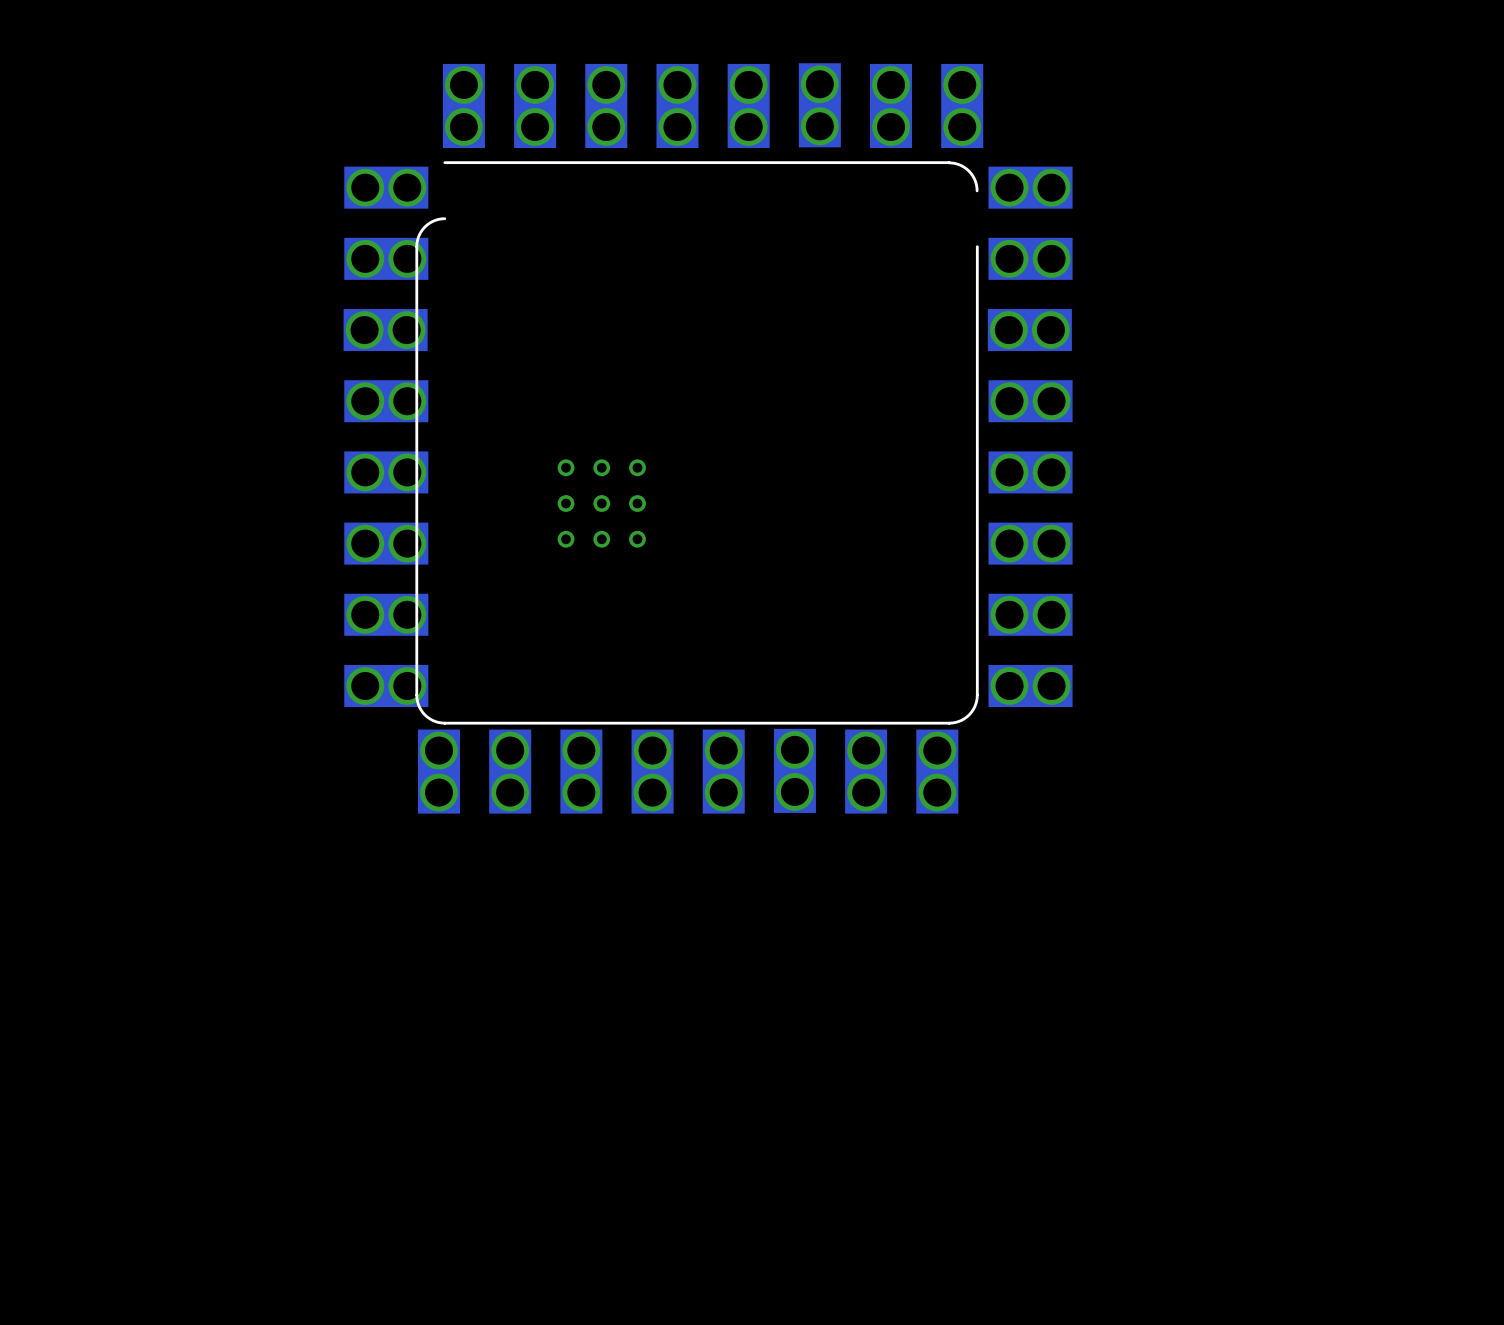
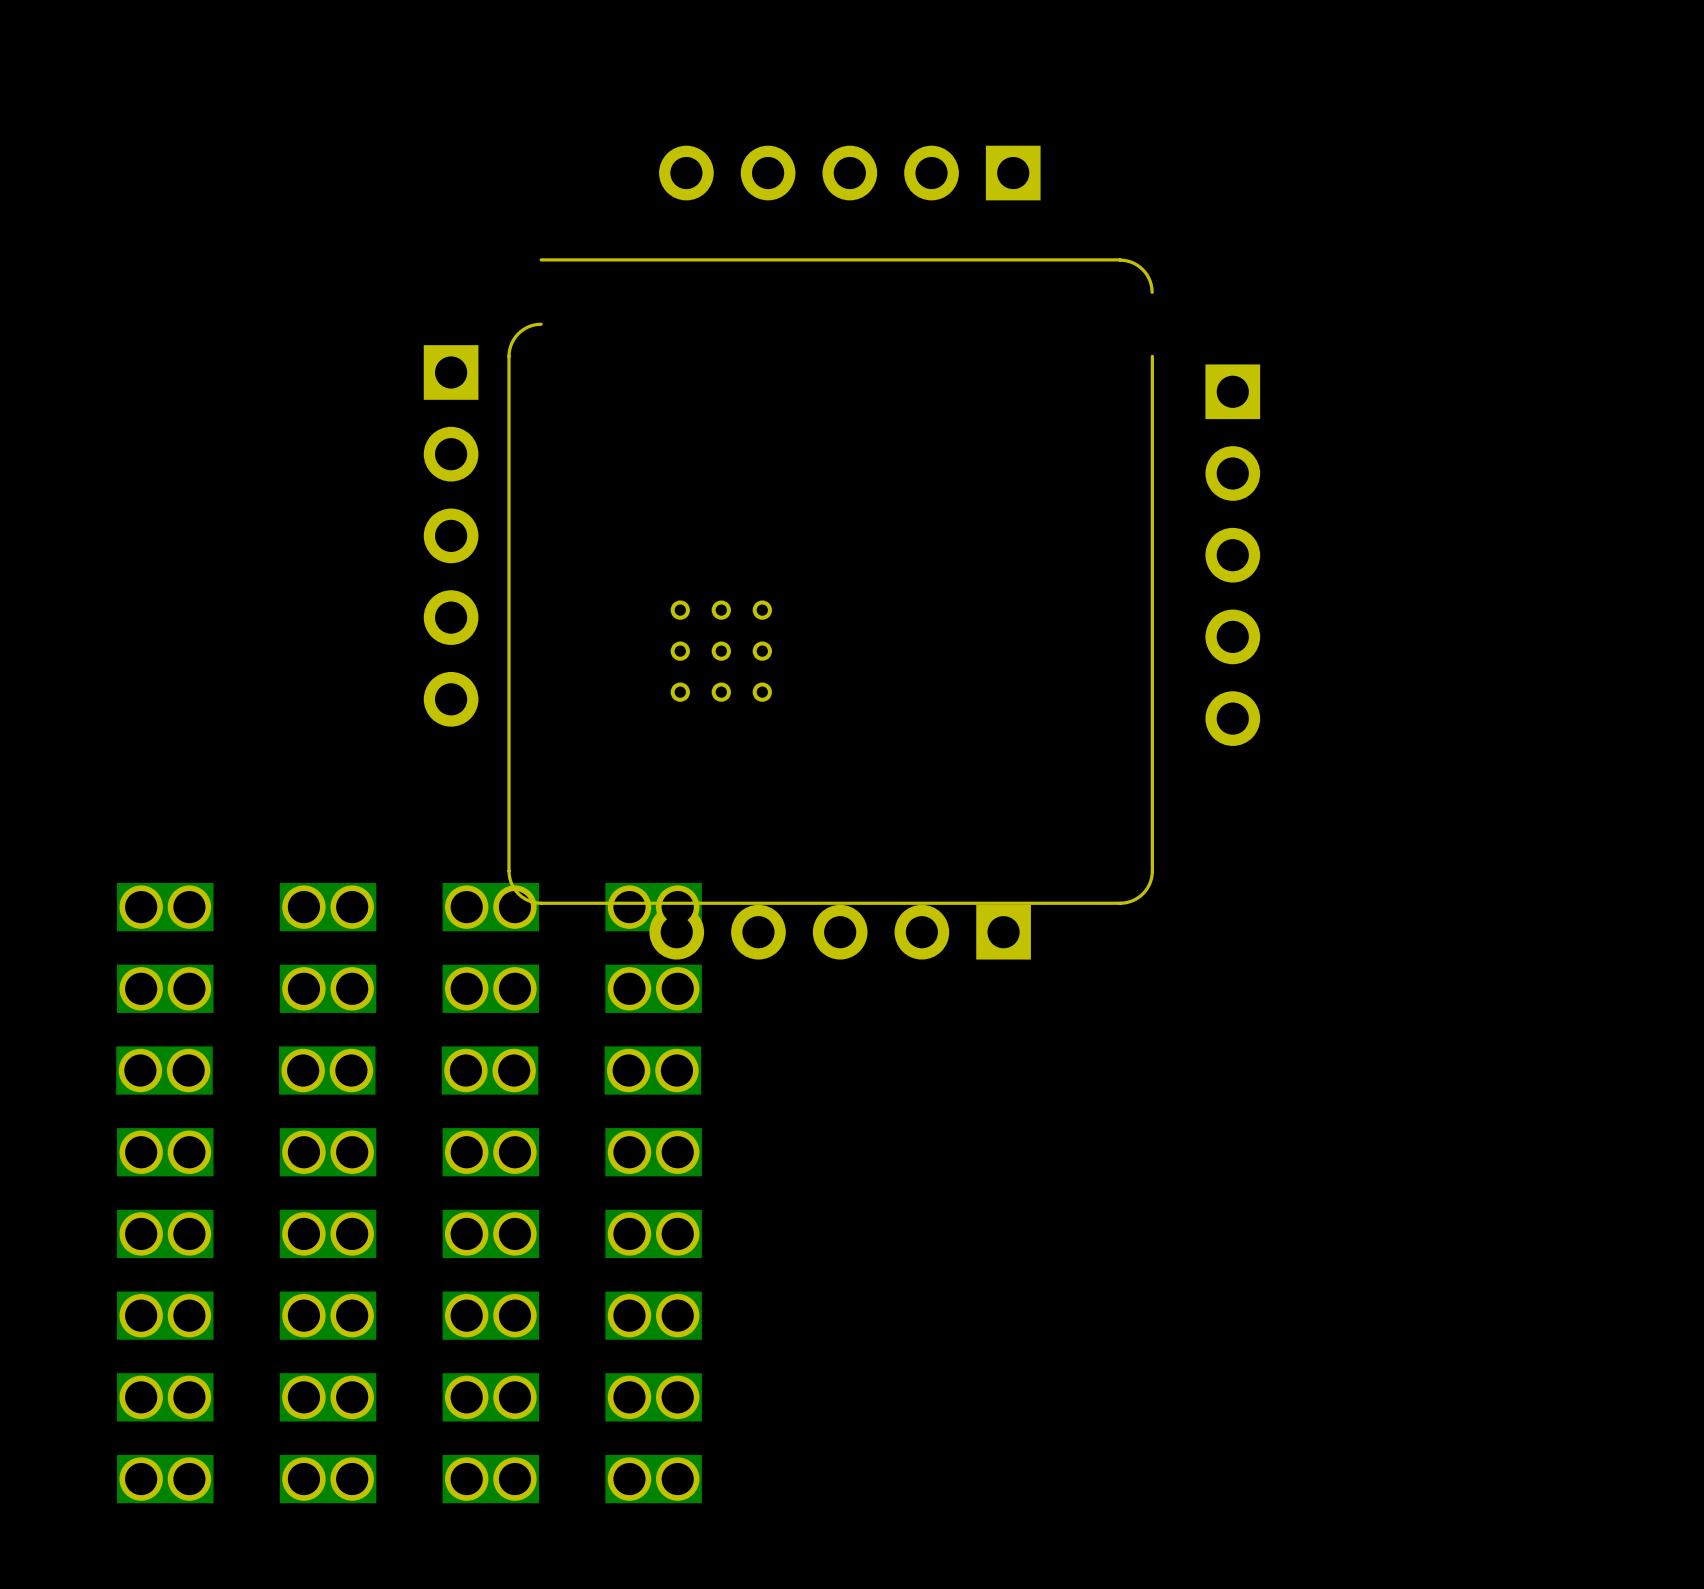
part footprint: [442, 63, 984, 149] -> [659, 145, 1041, 201]
part footprint: [987, 166, 1073, 708] -> [1205, 364, 1261, 746]
part: none -> (451, 535)
part: (385, 436) -> none
part: none -> (840, 932)
part: (688, 771) -> none
part: none -> (164, 1193)
part: none -> (327, 1193)
part: none -> (490, 1193)
part: none -> (653, 1193)

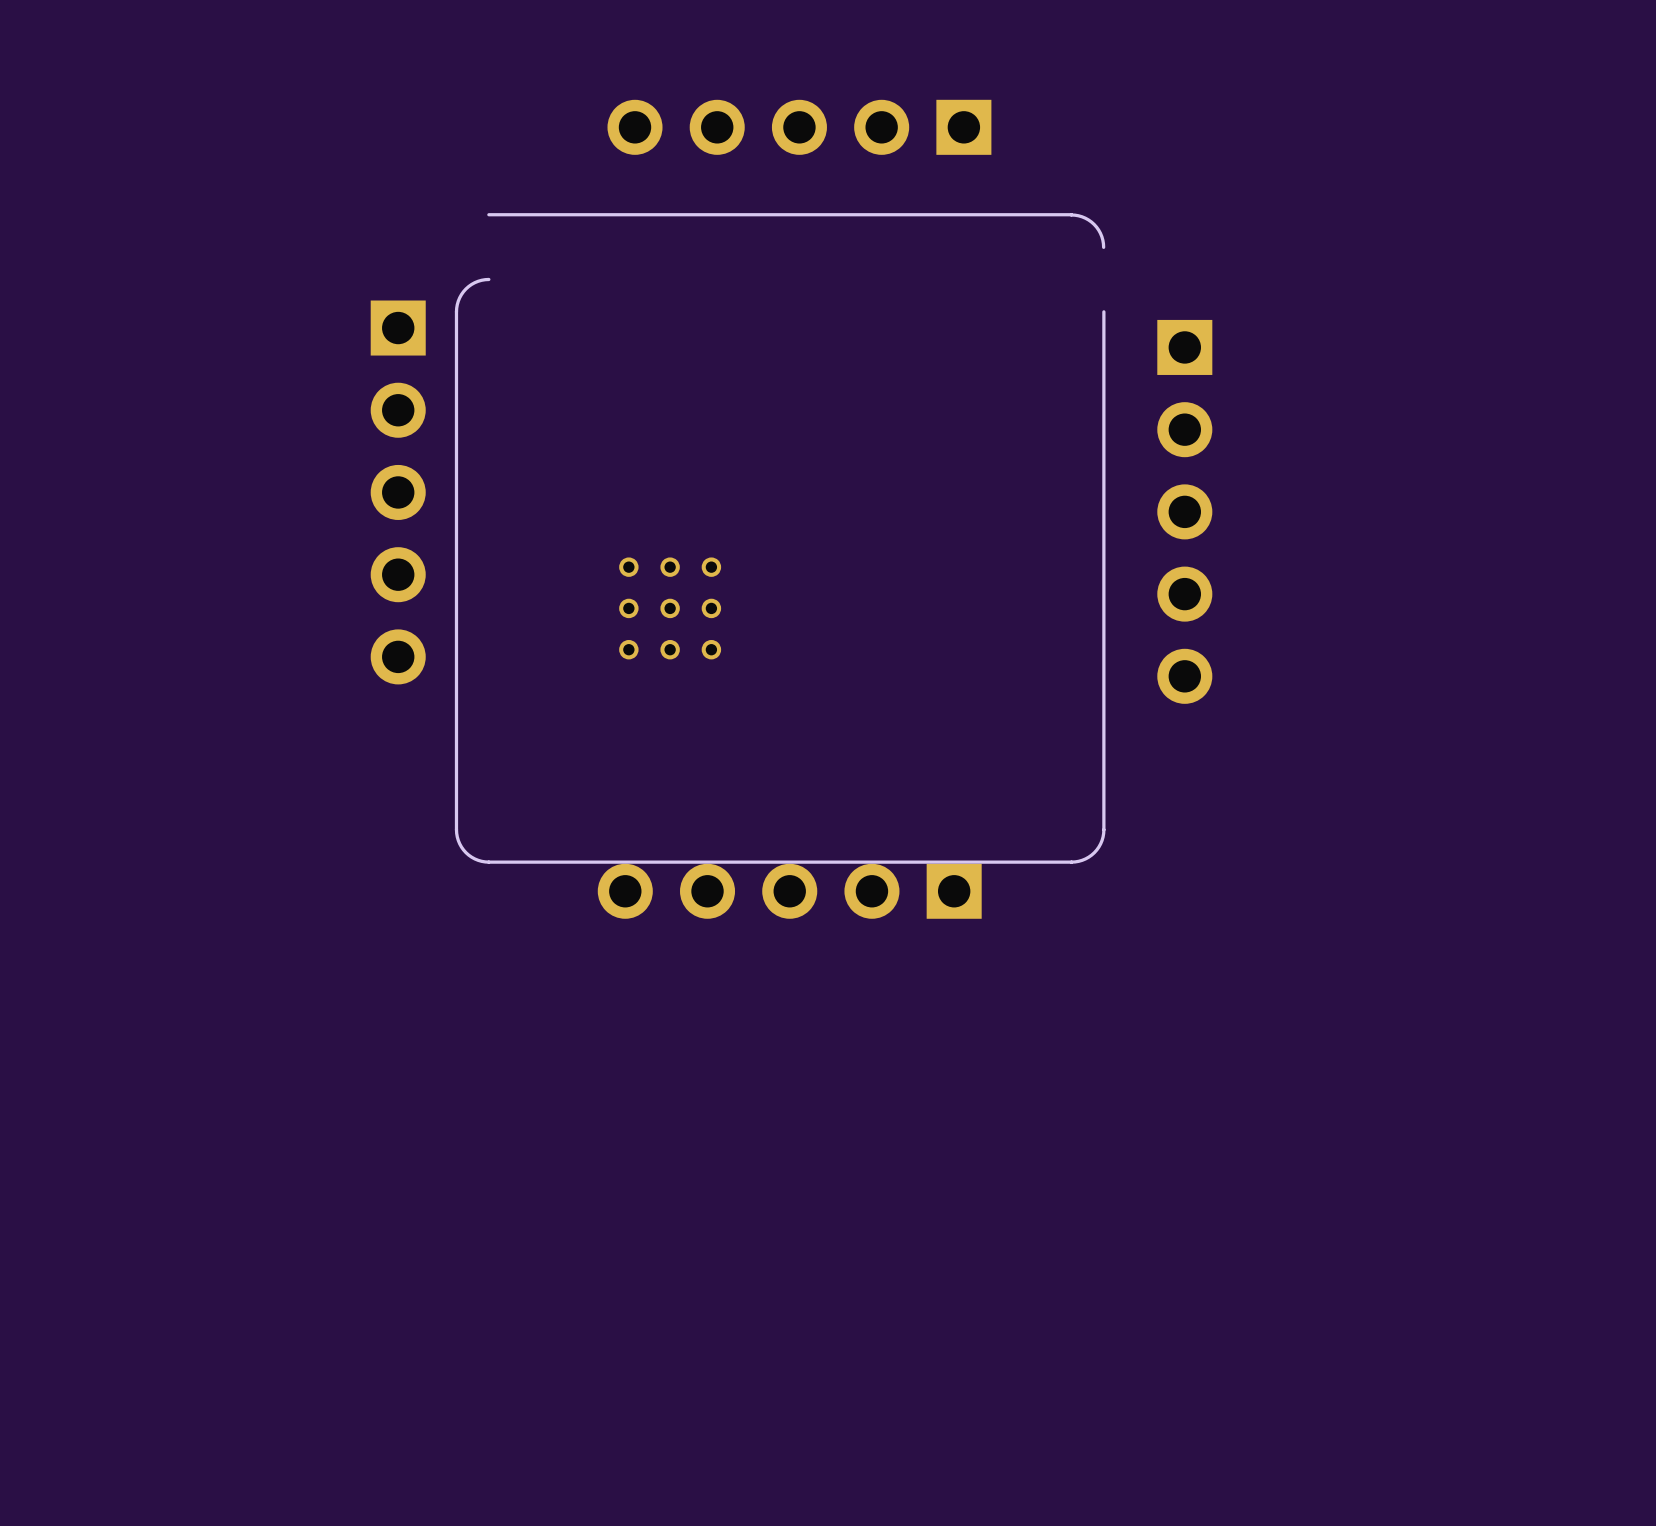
part: (164, 1193) -> none
part: (327, 1193) -> none
part: (490, 1193) -> none
part: (653, 1193) -> none

